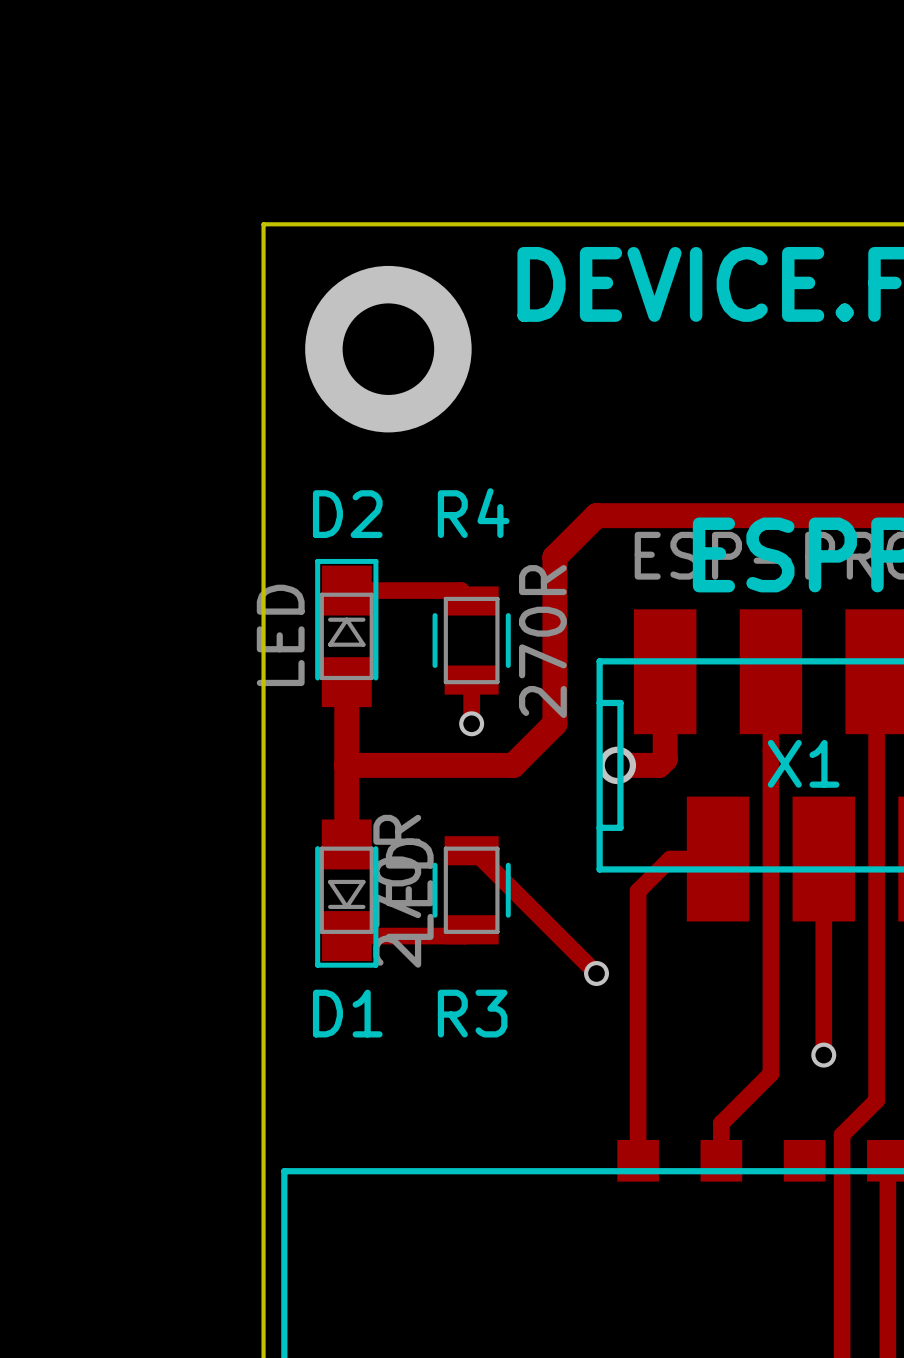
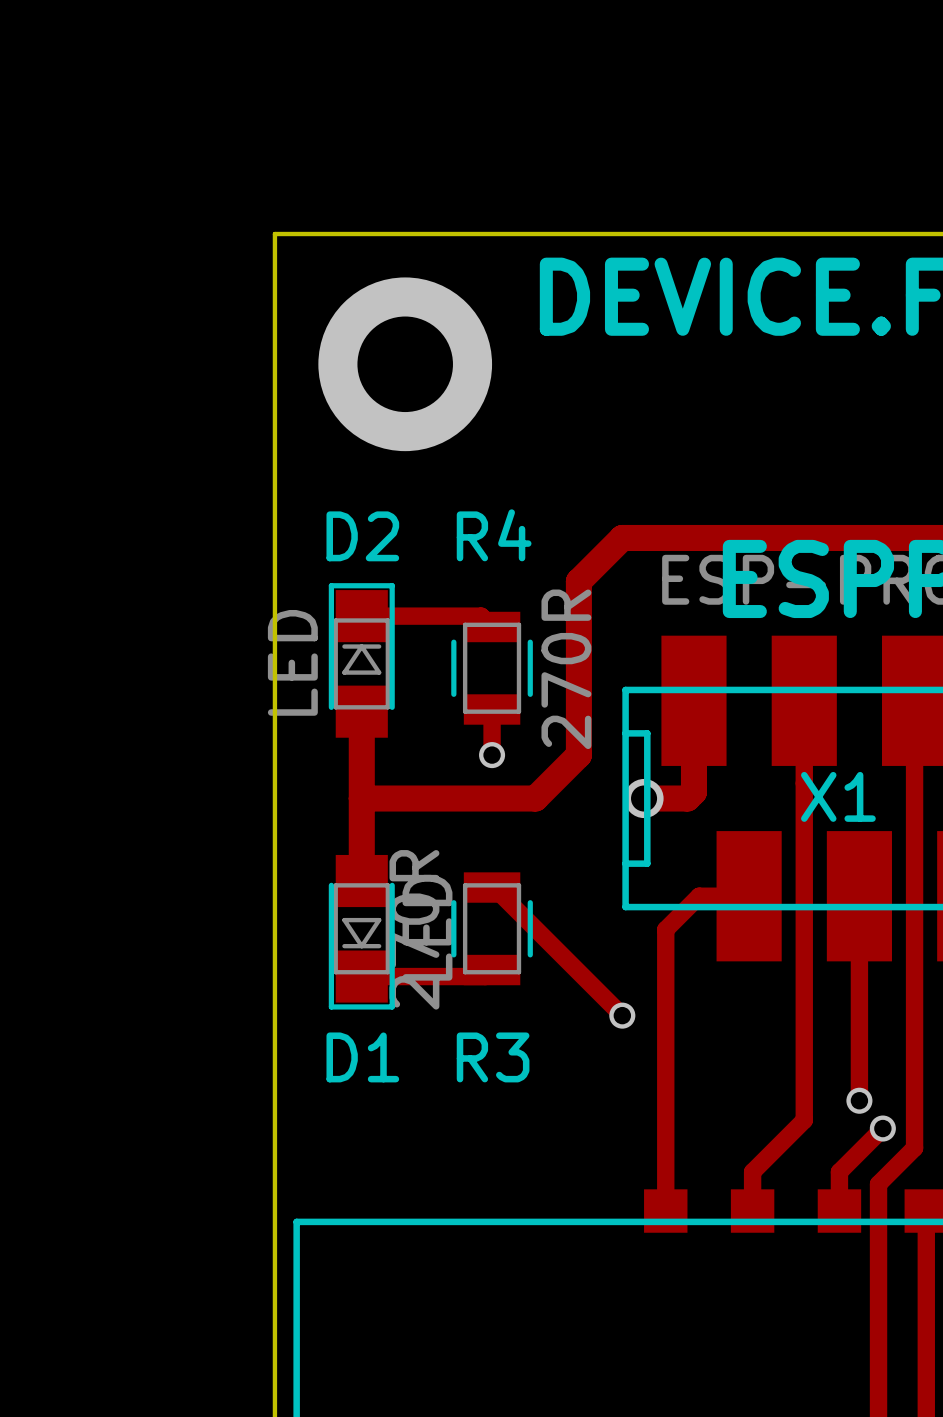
track: none -> (882, 1128) (839, 1171) (839, 1211)
via: none -> (882, 1128)

